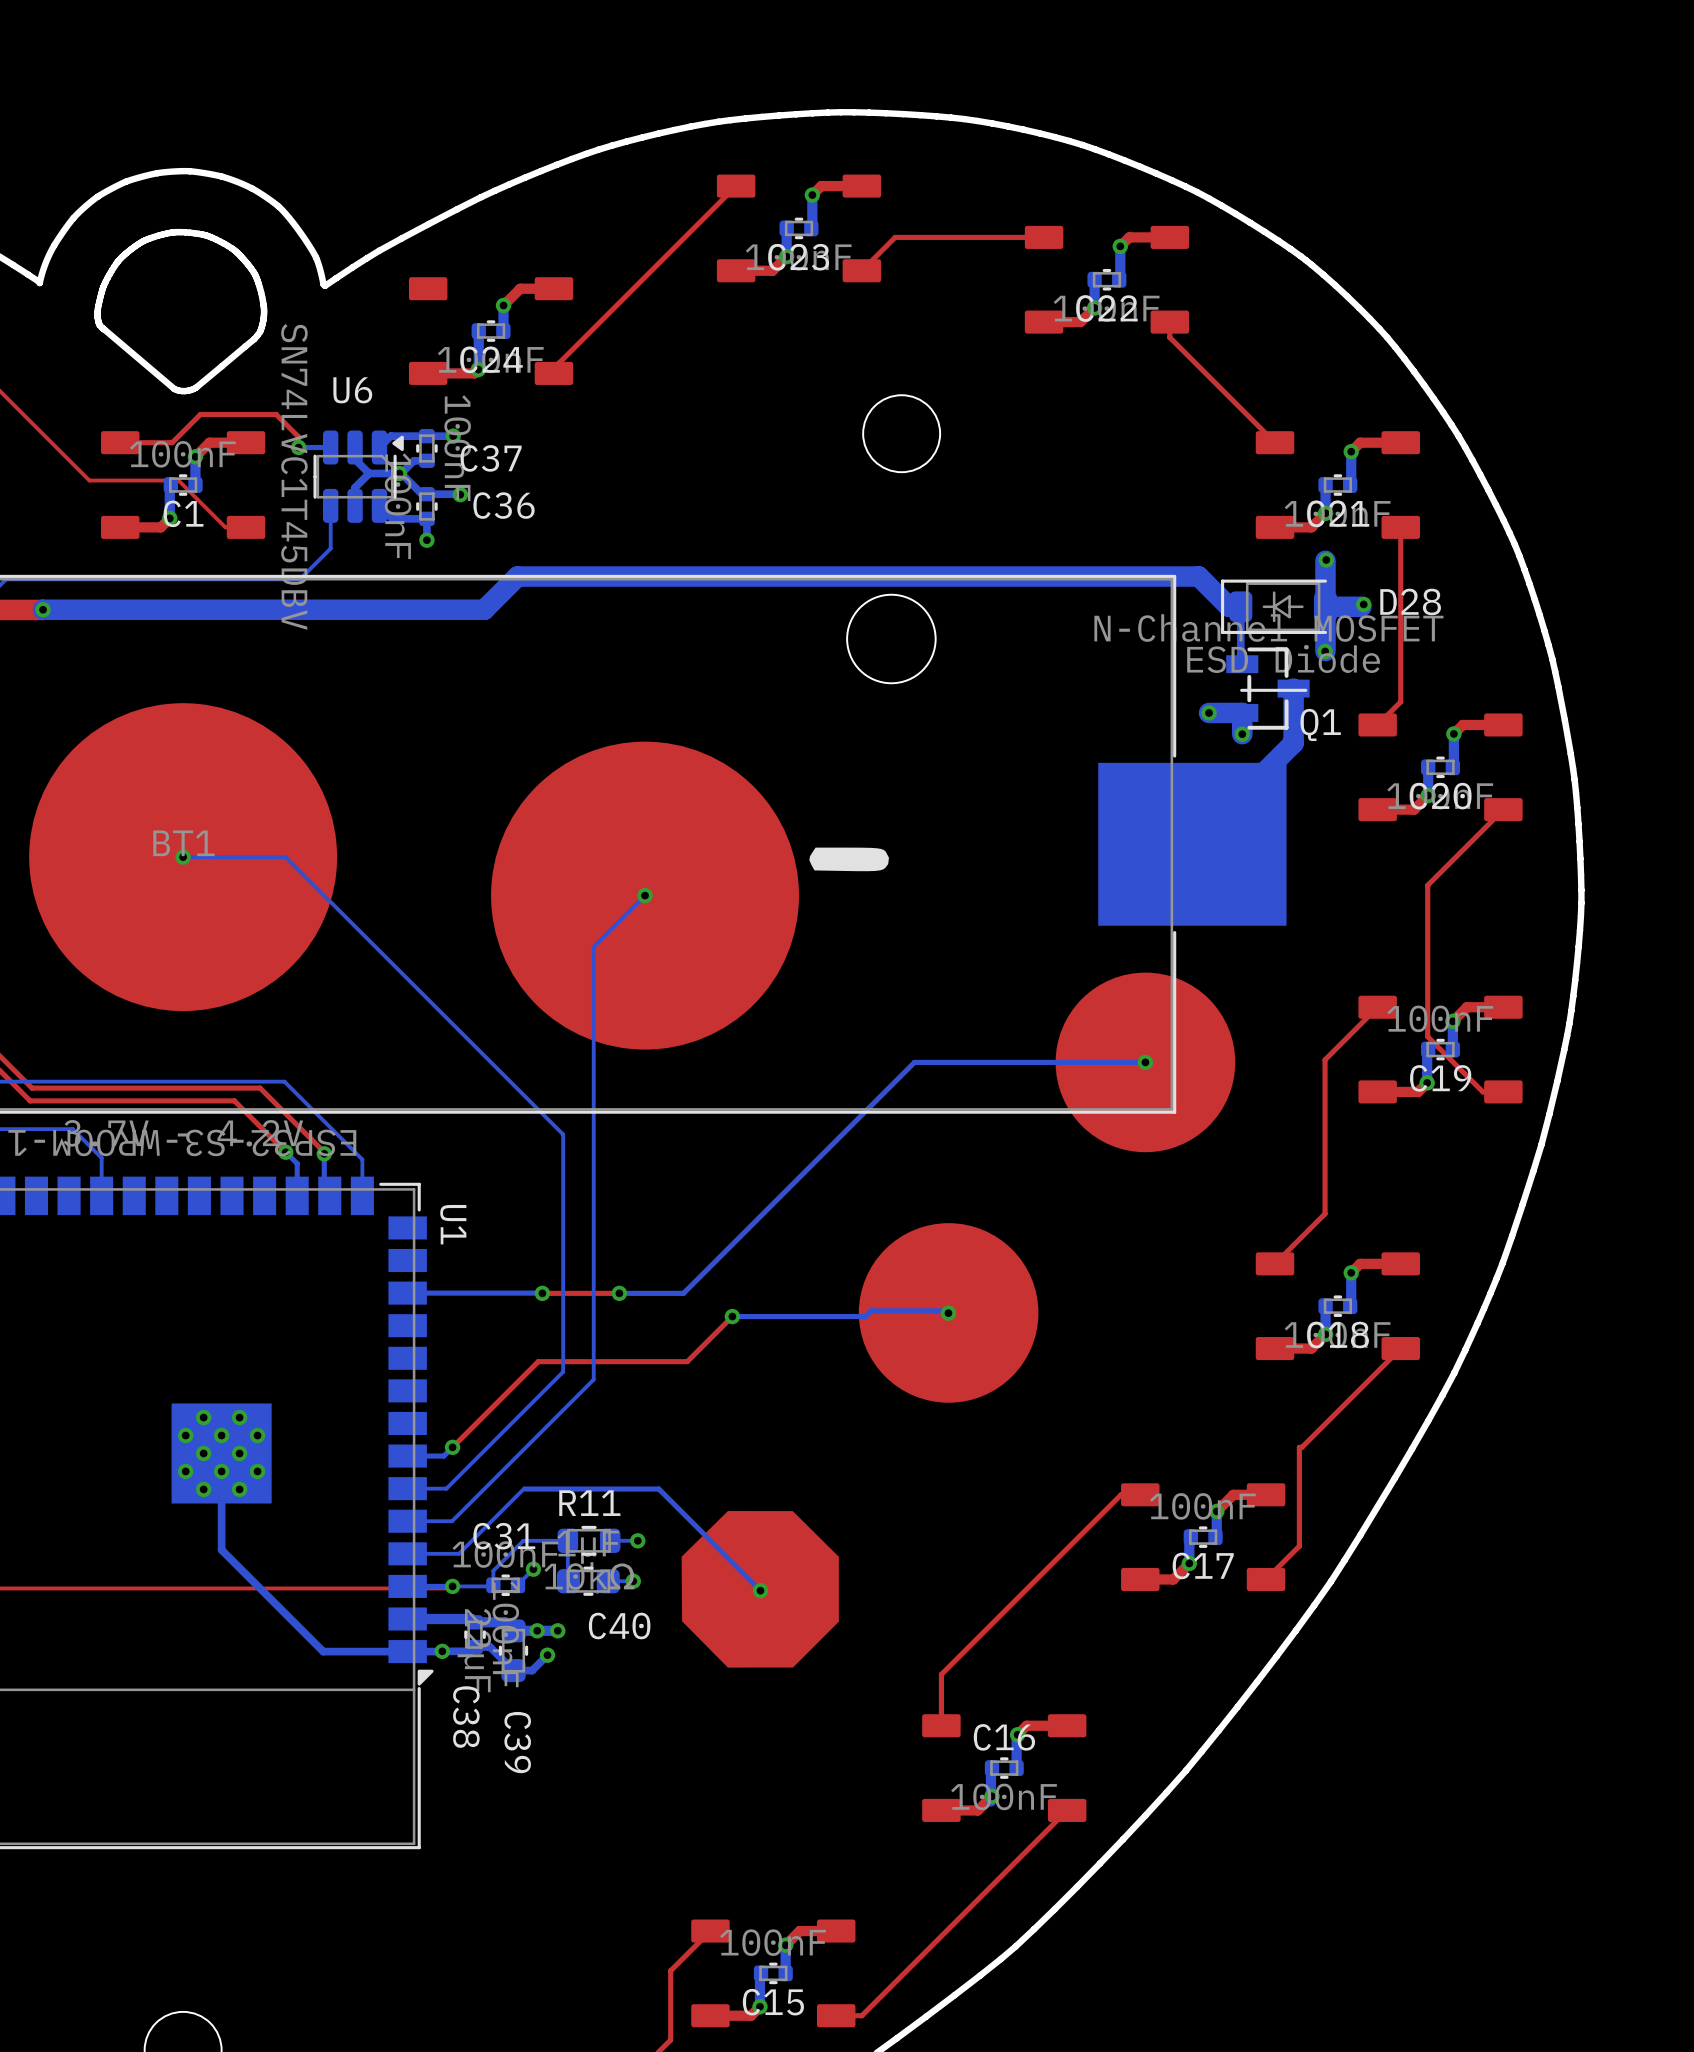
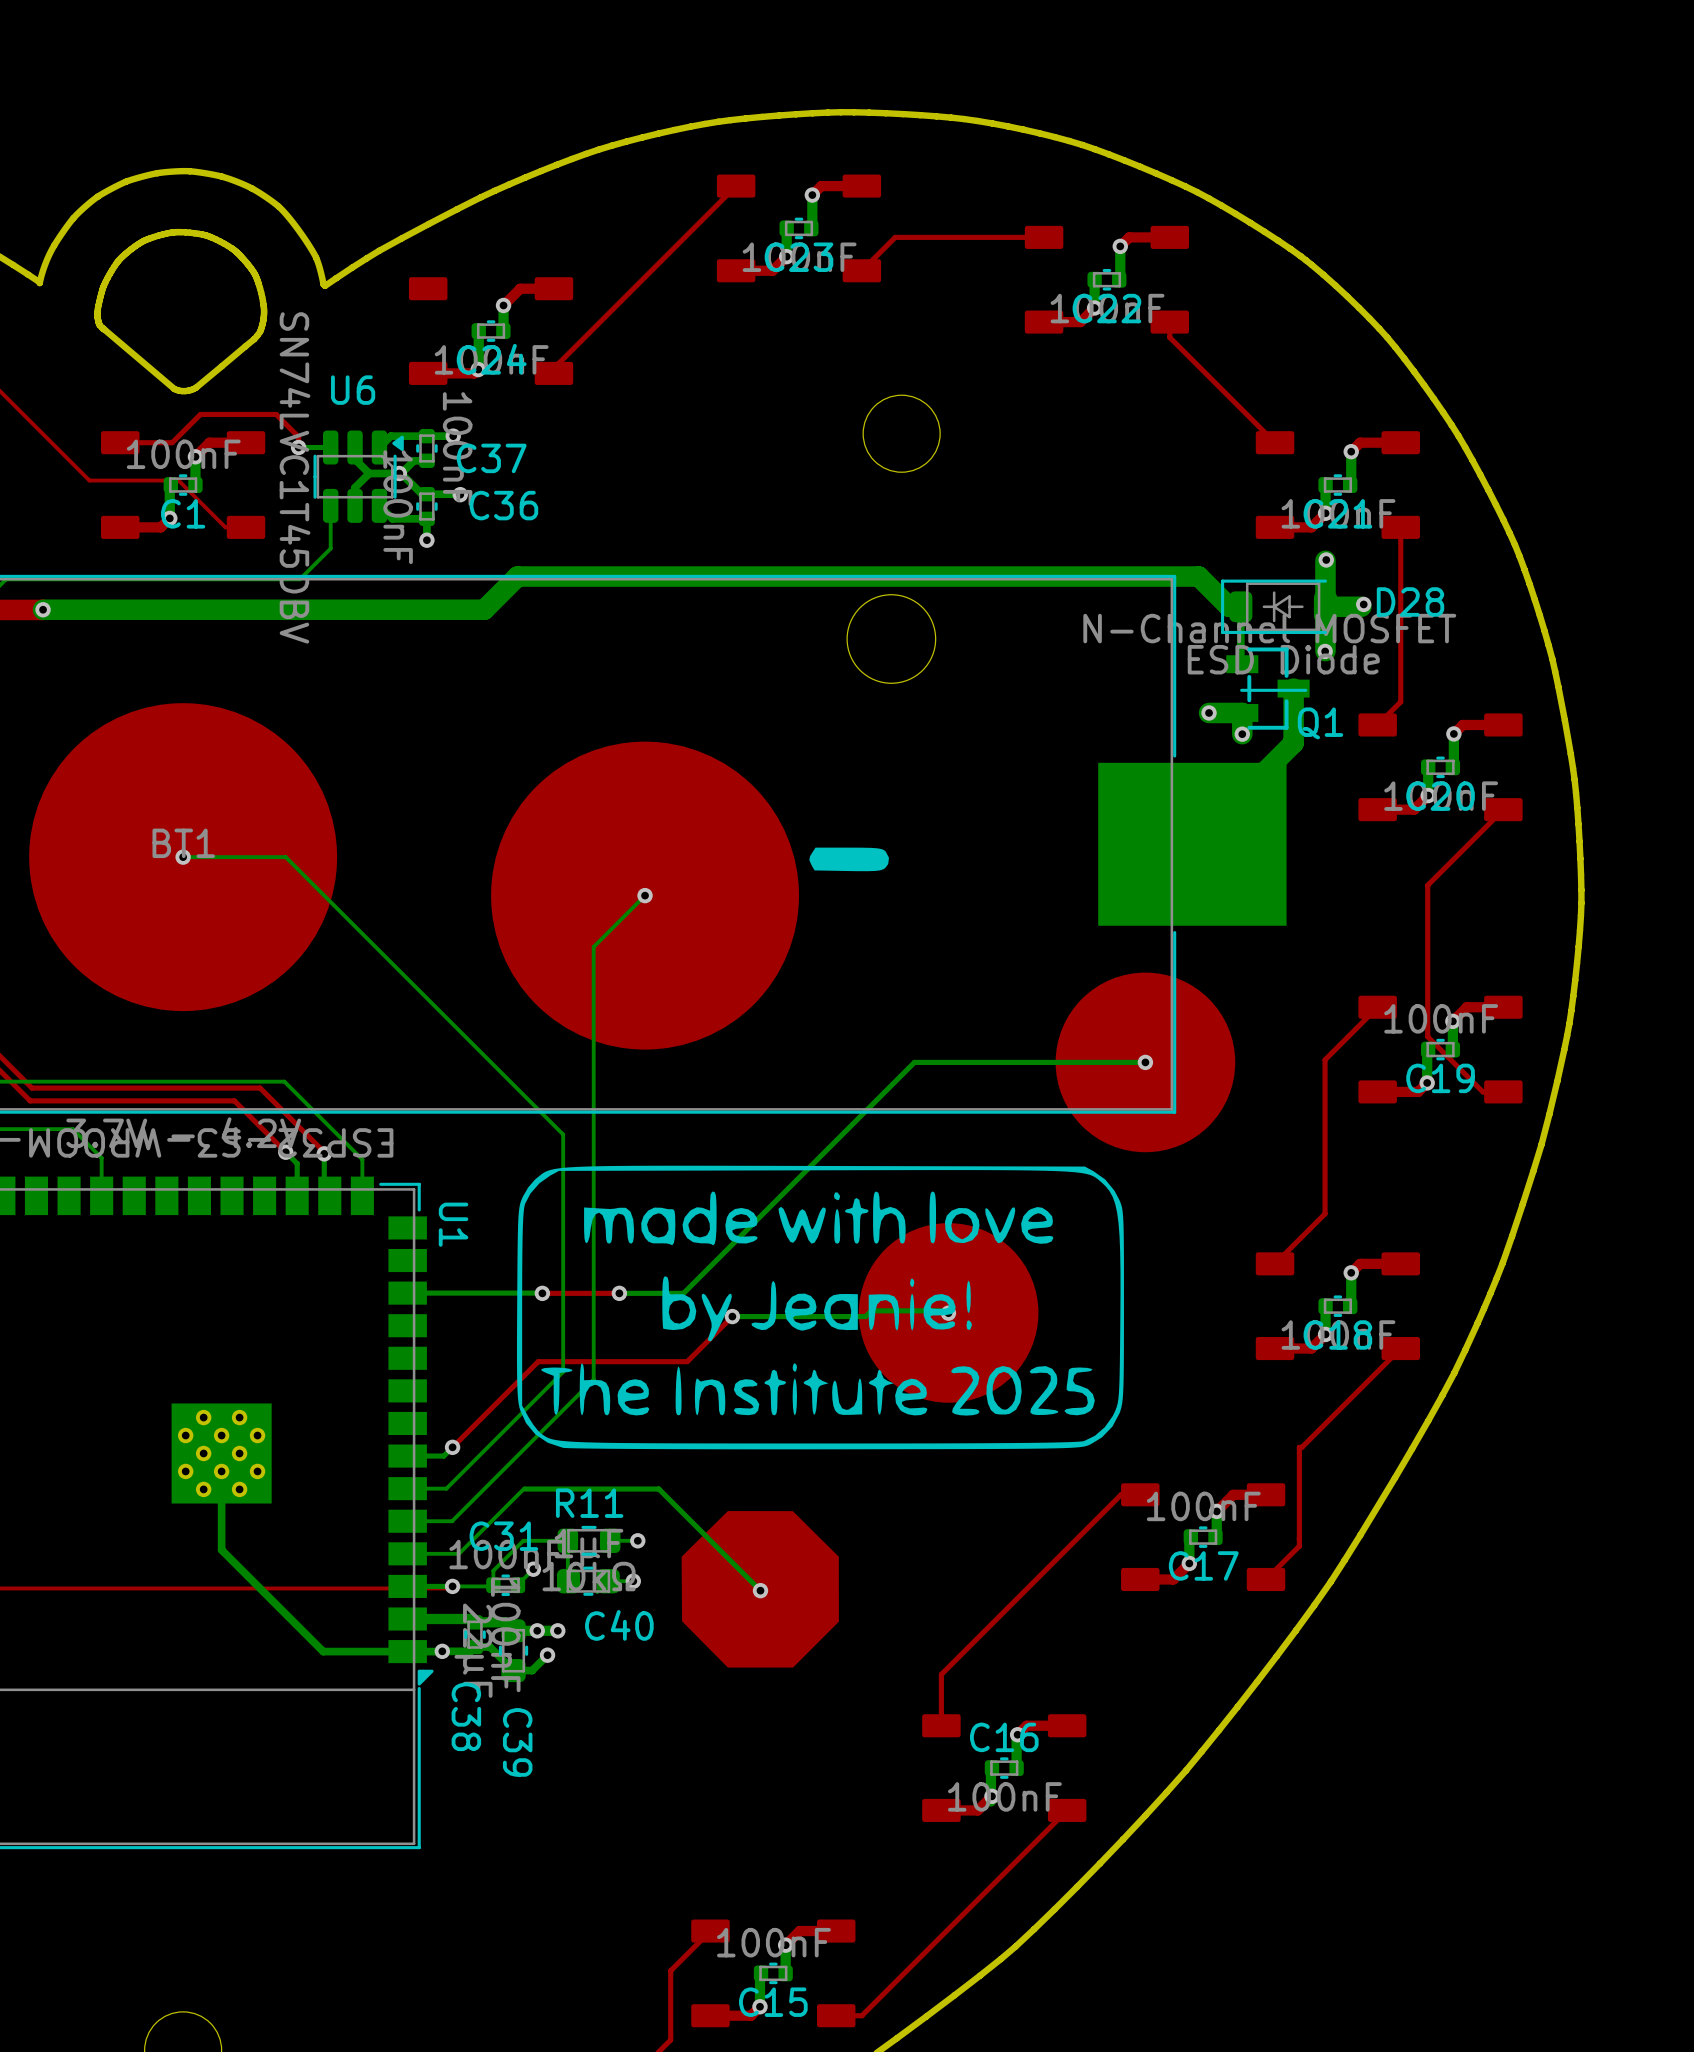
drawing: none -> [516, 1165, 1124, 1450]

